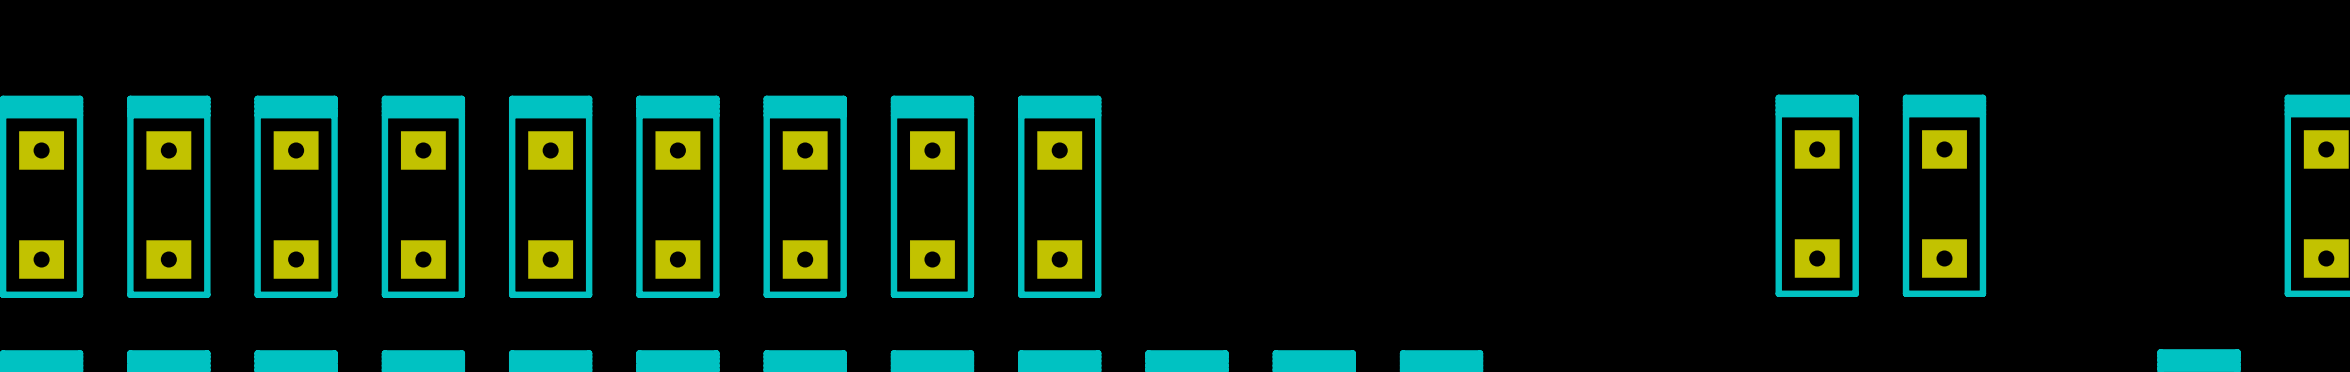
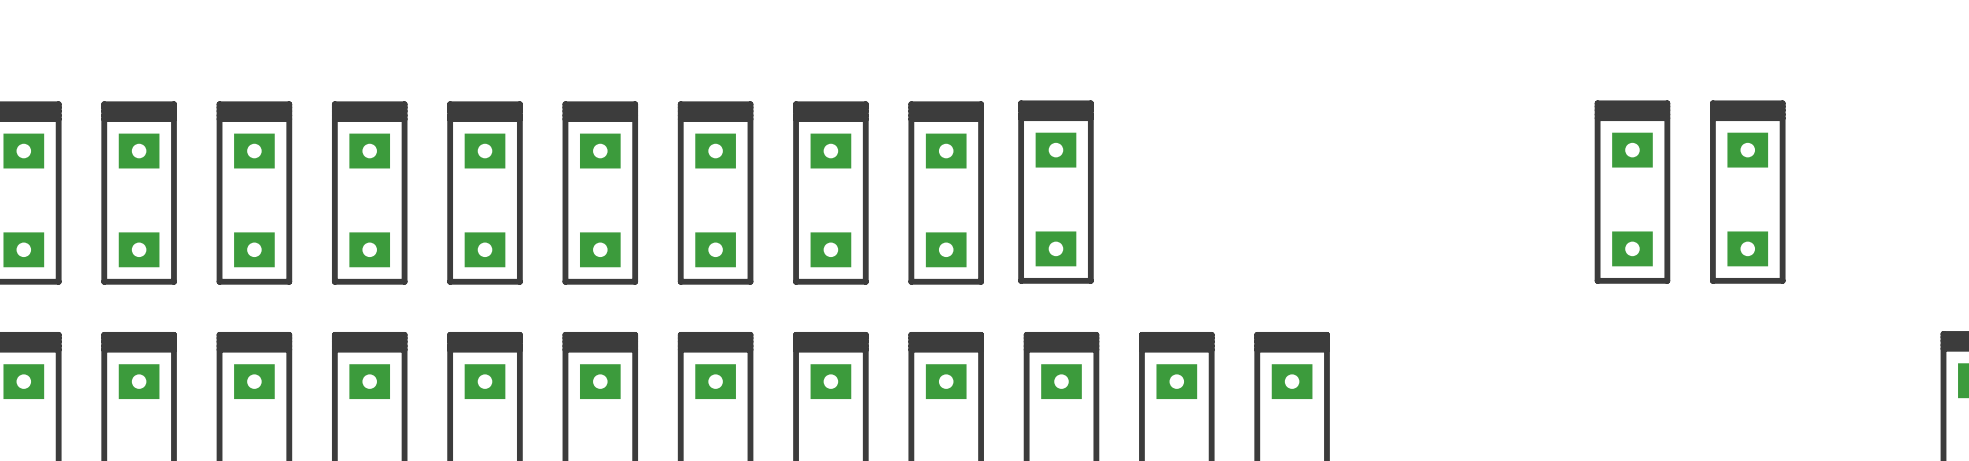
part: none -> (1055, 192)

